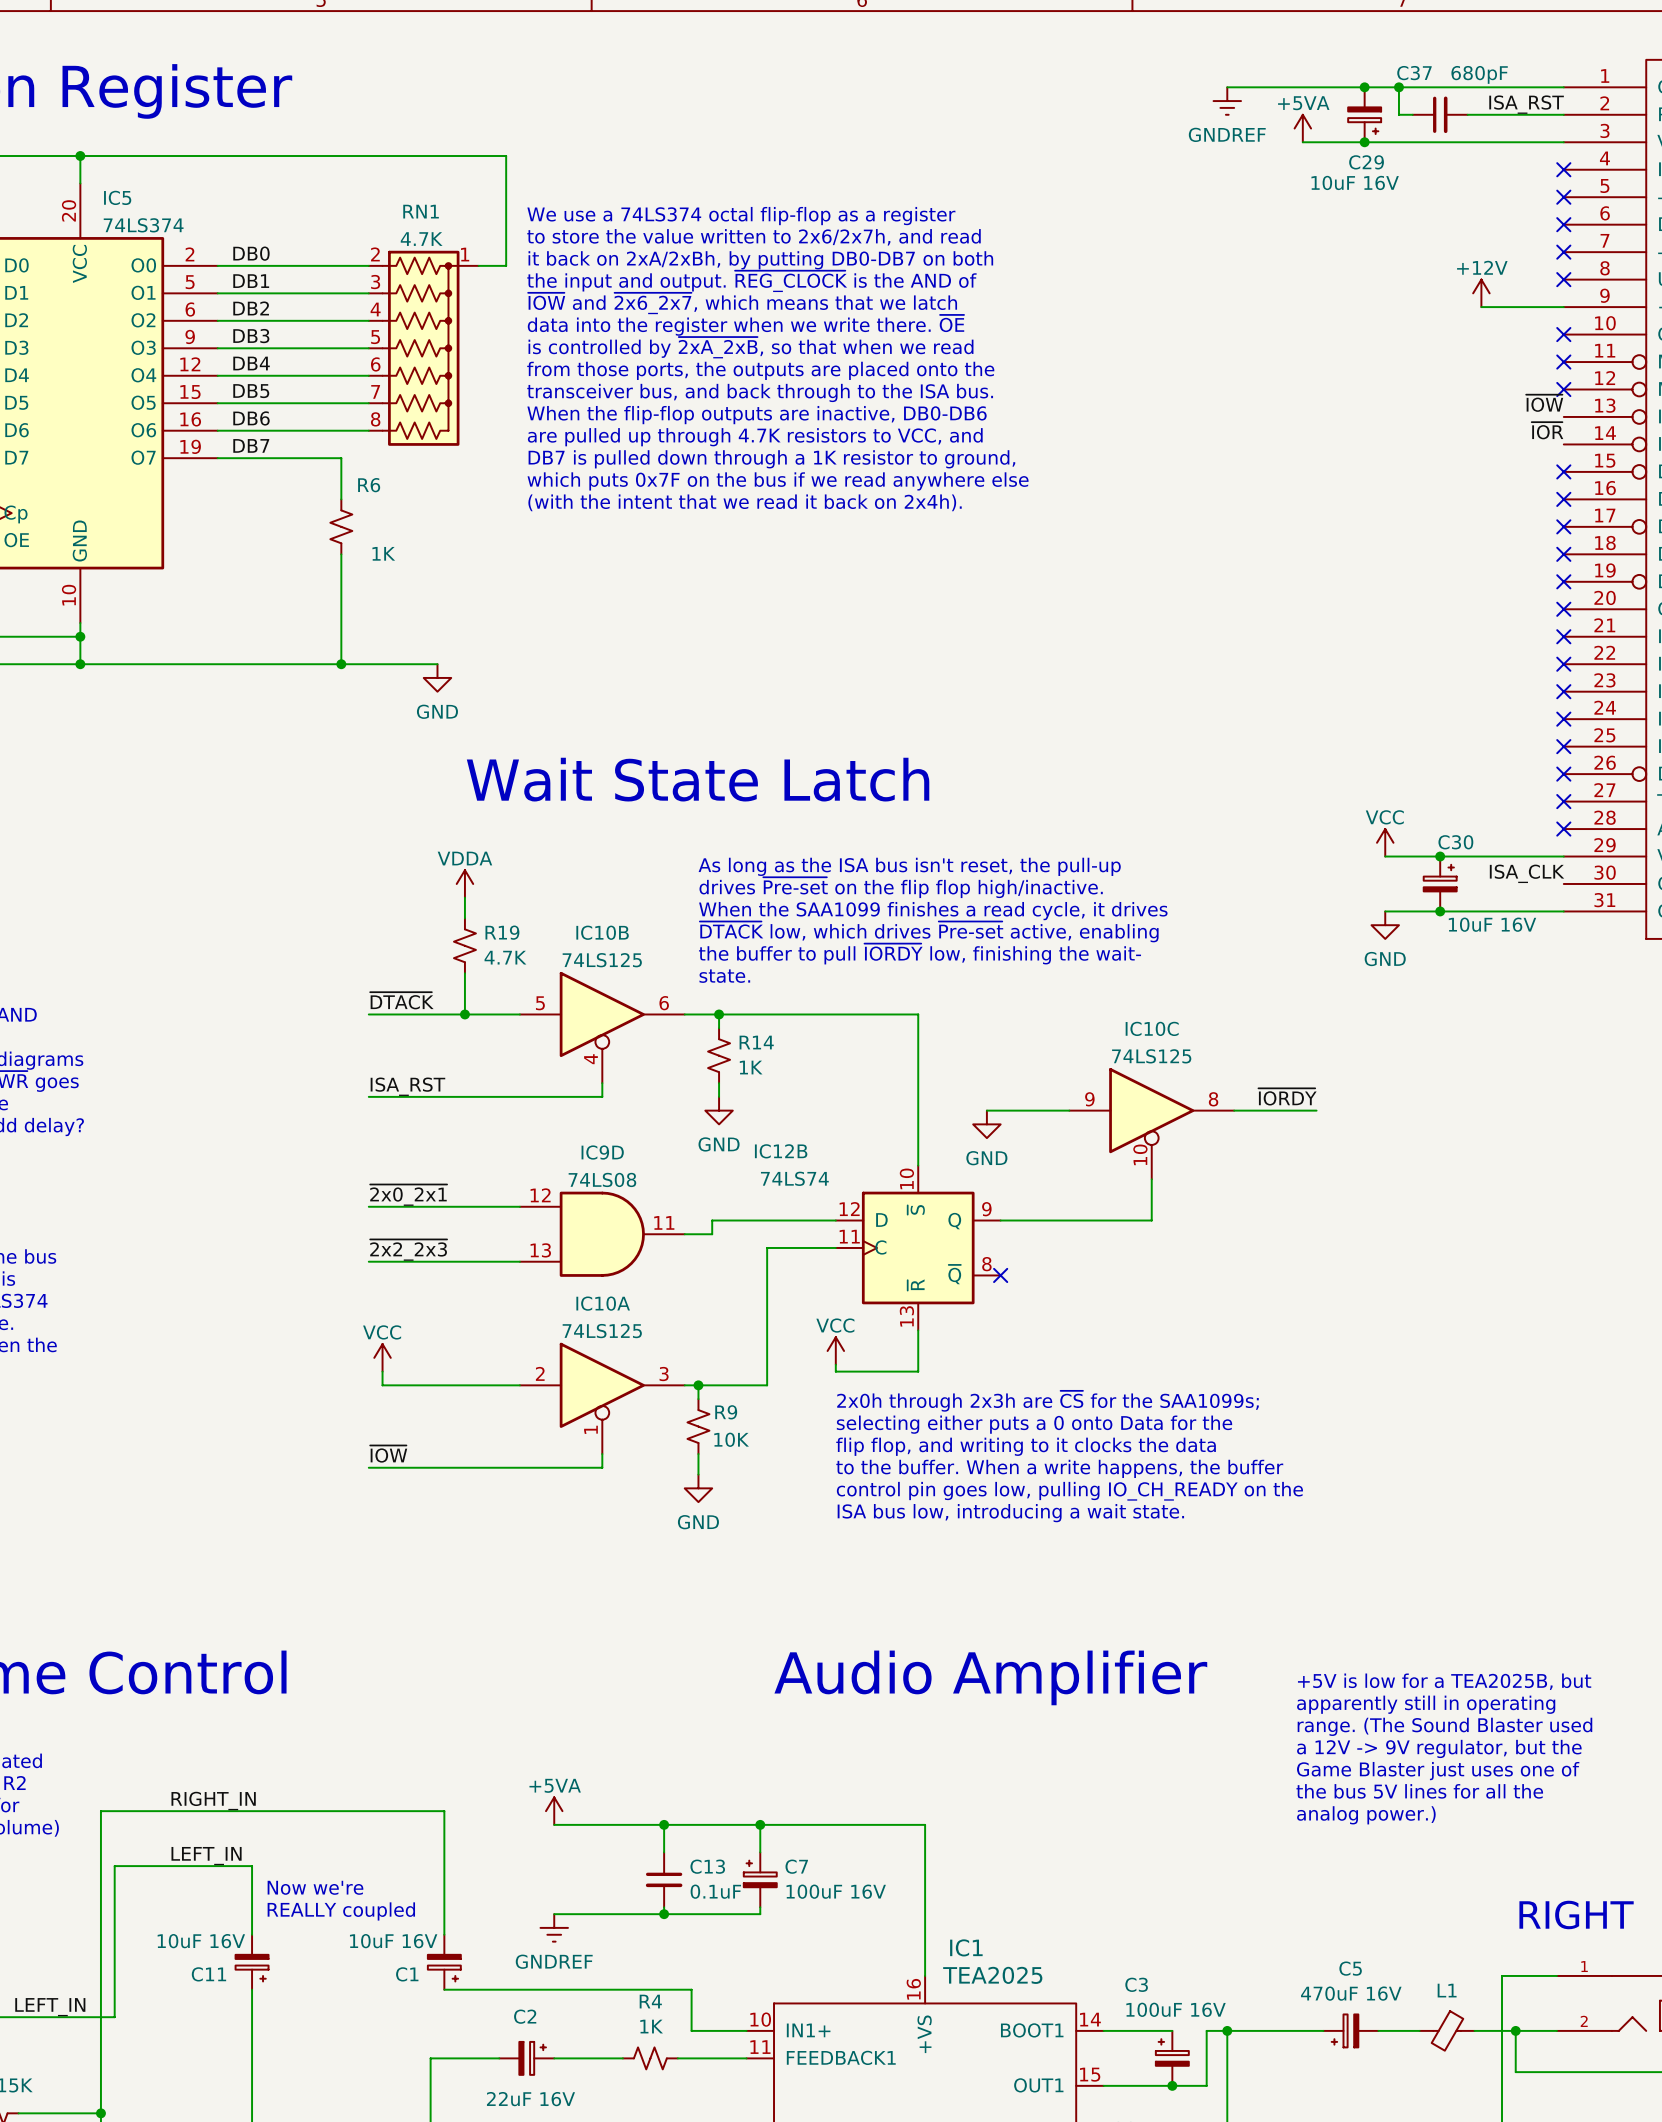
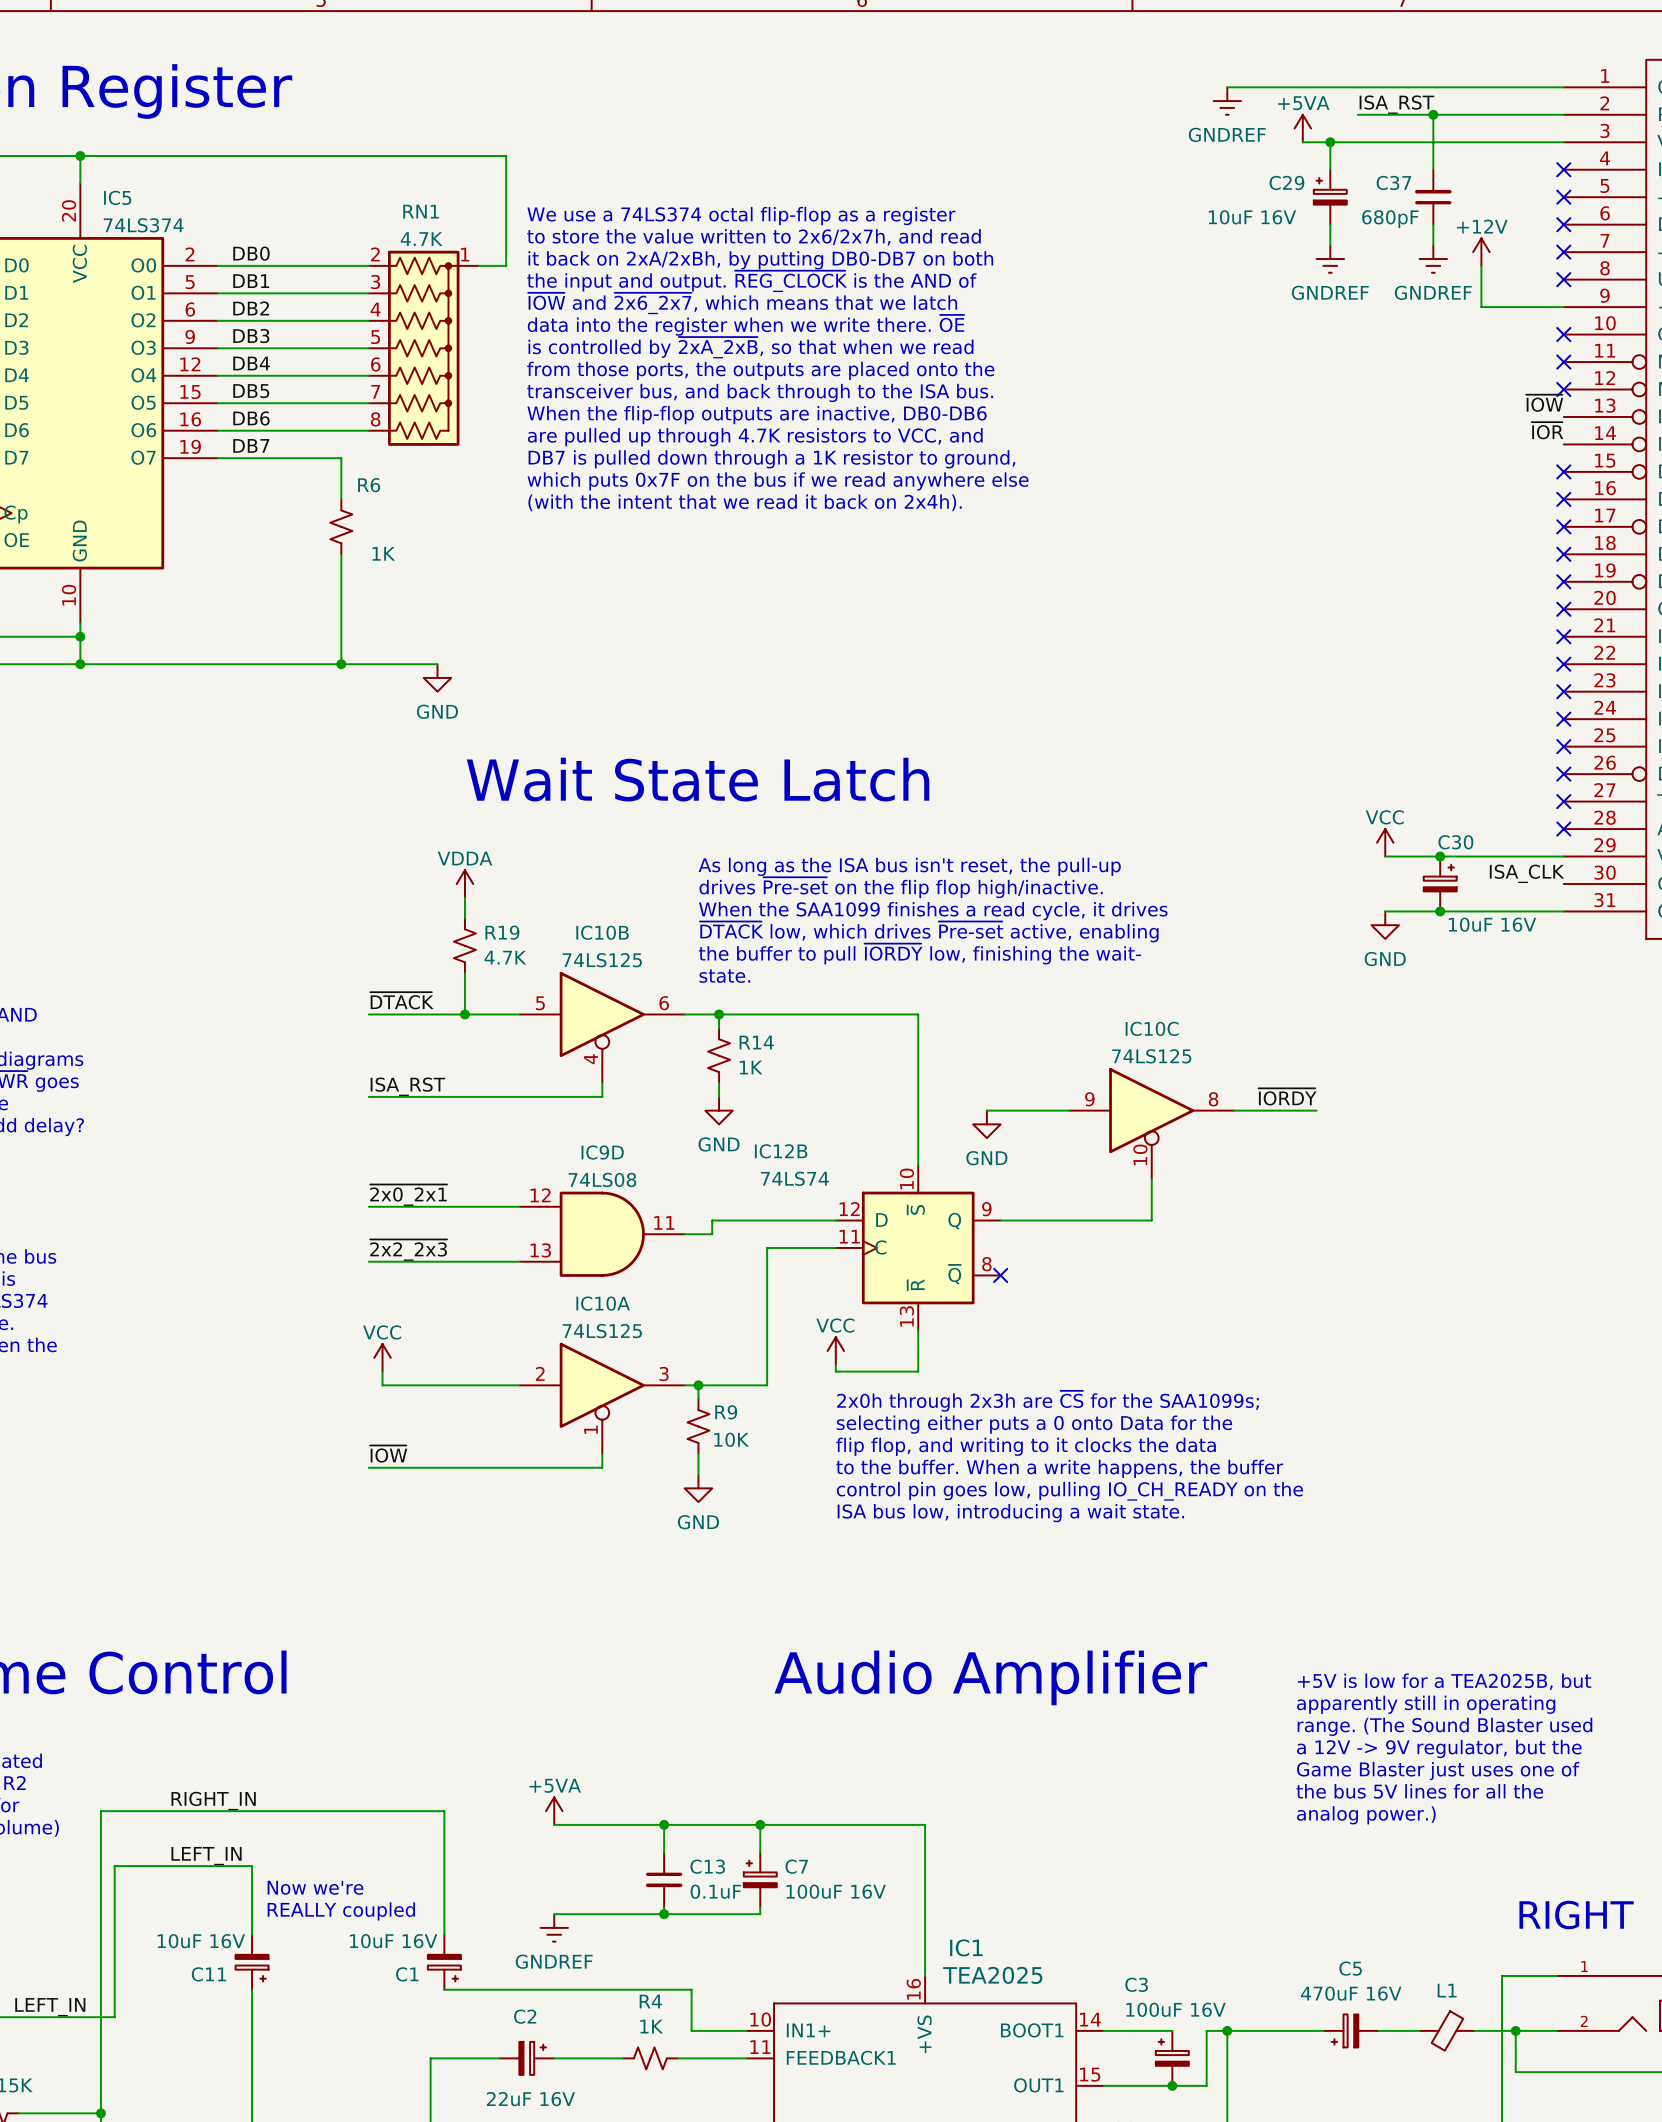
C37 name position: C37 (1414, 73) -> C37 (1393, 182)
C37 value position: 680pF (1479, 74) -> 680pF (1390, 219)
junction: (1364, 87) -> none
wire: (1398, 87) (1398, 114) -> (1357, 114) (1398, 114)
junction: (1398, 87) -> none
label position: ISA_RST (1526, 104) -> ISA_RST (1396, 104)
C29 position: (1364, 114) -> (1330, 197)
wire: none -> (1433, 114) (1433, 169)
junction: none -> (1433, 114)
C37 rotation: 0° (1440, 114) -> 90° counterclockwise (1433, 197)
C37 position: (1440, 114) -> (1433, 197)
C29 rotation: 0° (1364, 120) -> 180° (1330, 191)
wire: none -> (1330, 142) (1330, 169)
junction: none -> (1330, 142)
junction: (1364, 142) -> none
C29 name position: C29 (1366, 162) -> C29 (1286, 182)
C29 value position: 10uF 16V (1355, 182) -> 10uF 16V (1252, 217)
wire: none -> (1330, 224) (1330, 245)
wire: none -> (1433, 224) (1433, 245)
power symbol: none -> GNDREF (1330, 259)
power symbol: none -> GNDREF (1433, 259)
power symbol position: +12V (1481, 293) -> +12V (1481, 252)

